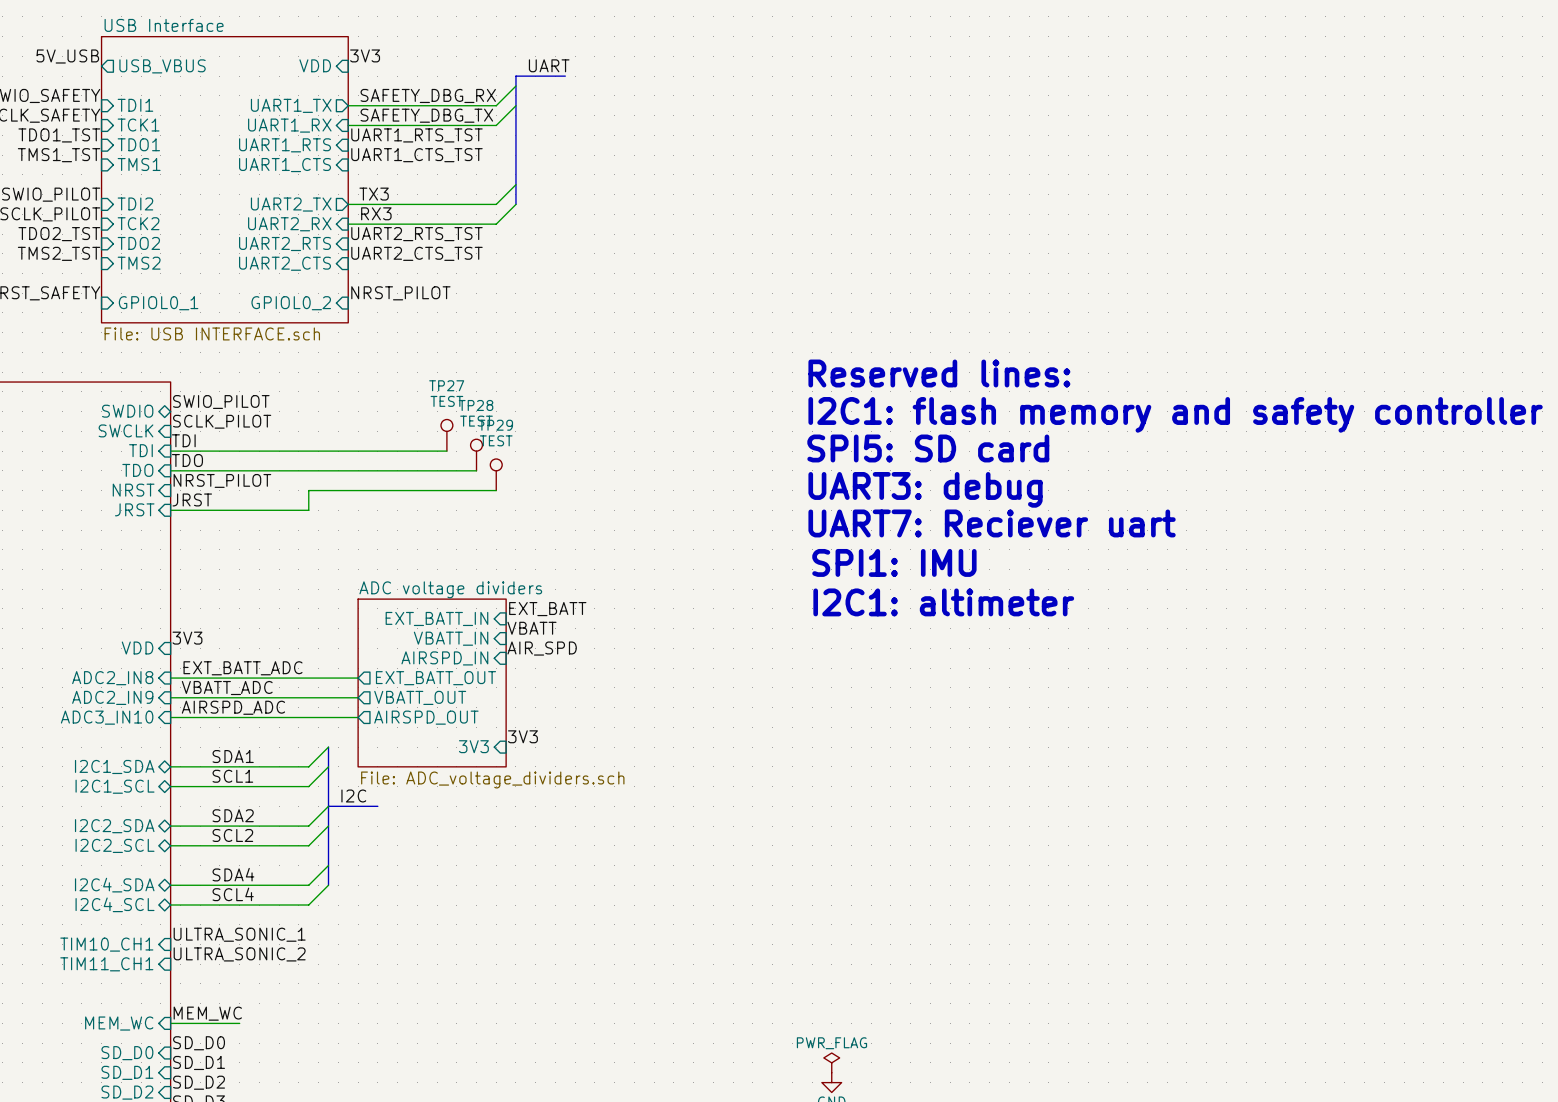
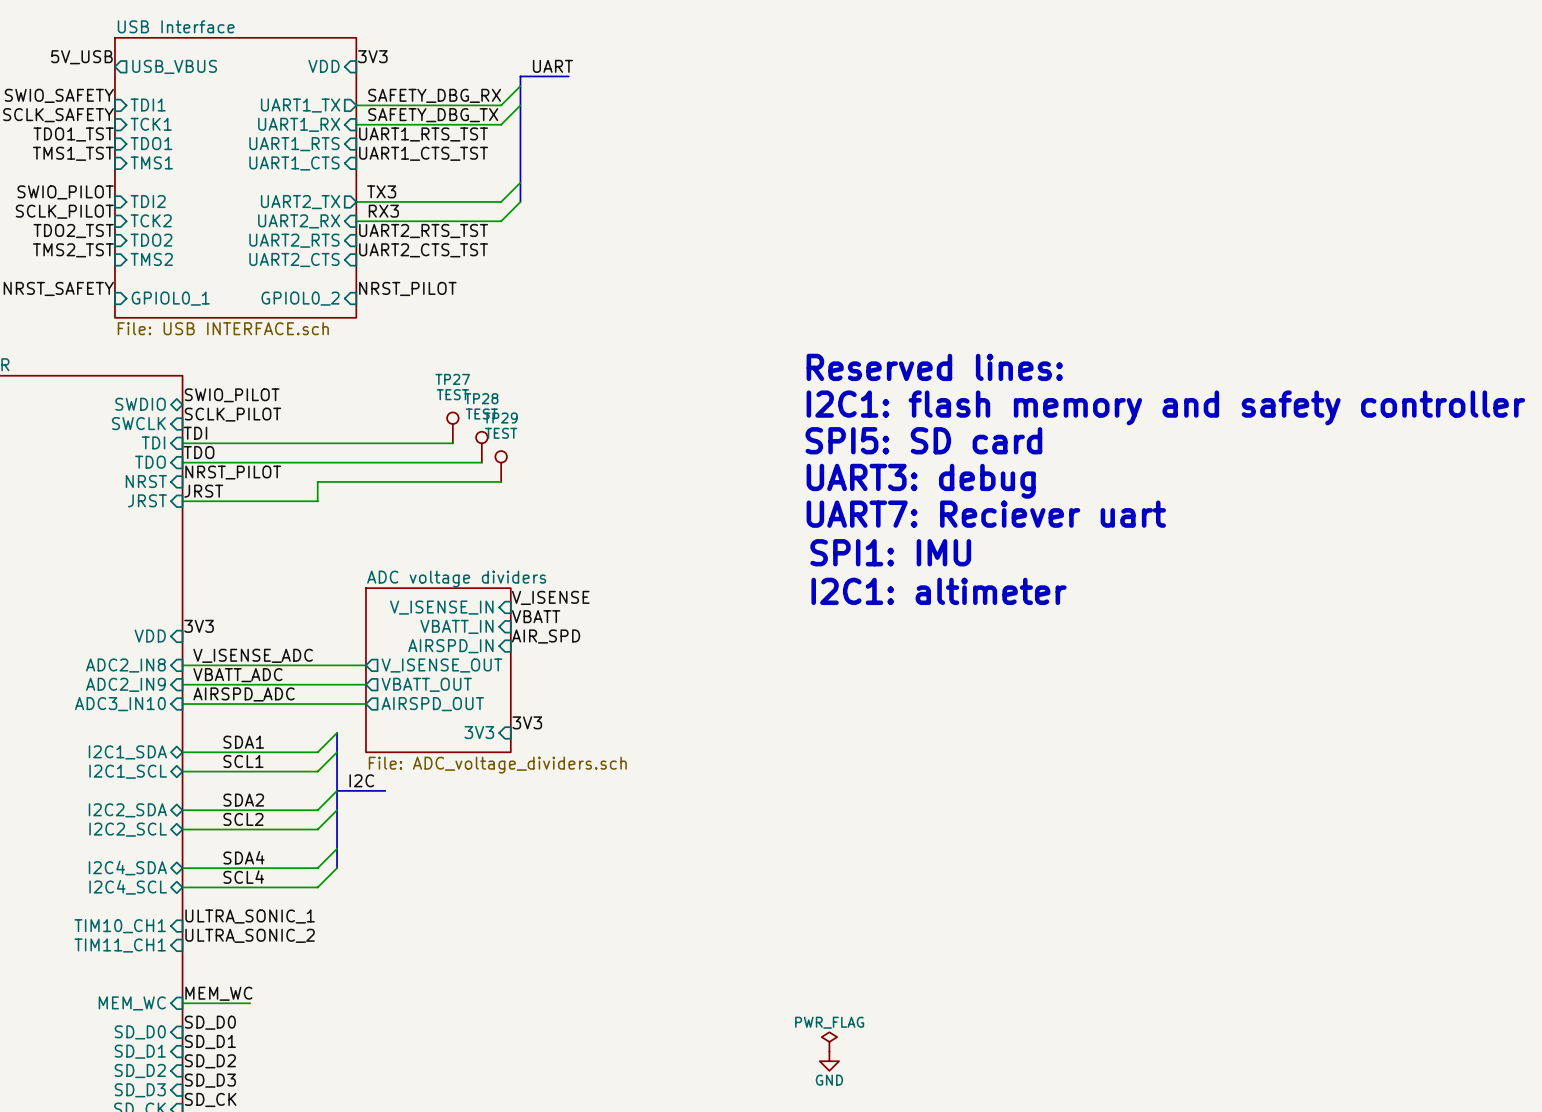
label: EXT_BATT (547, 609) -> V_ISENSE (550, 597)
sheet pin: EXT_BATT_IN (436, 618) -> V_ISENSE_IN (441, 607)
label: EXT_BATT_ADC (243, 668) -> V_ISENSE_ADC (253, 655)
sheet pin: EXT_BATT_OUT (435, 678) -> V_ISENSE_OUT (441, 665)

